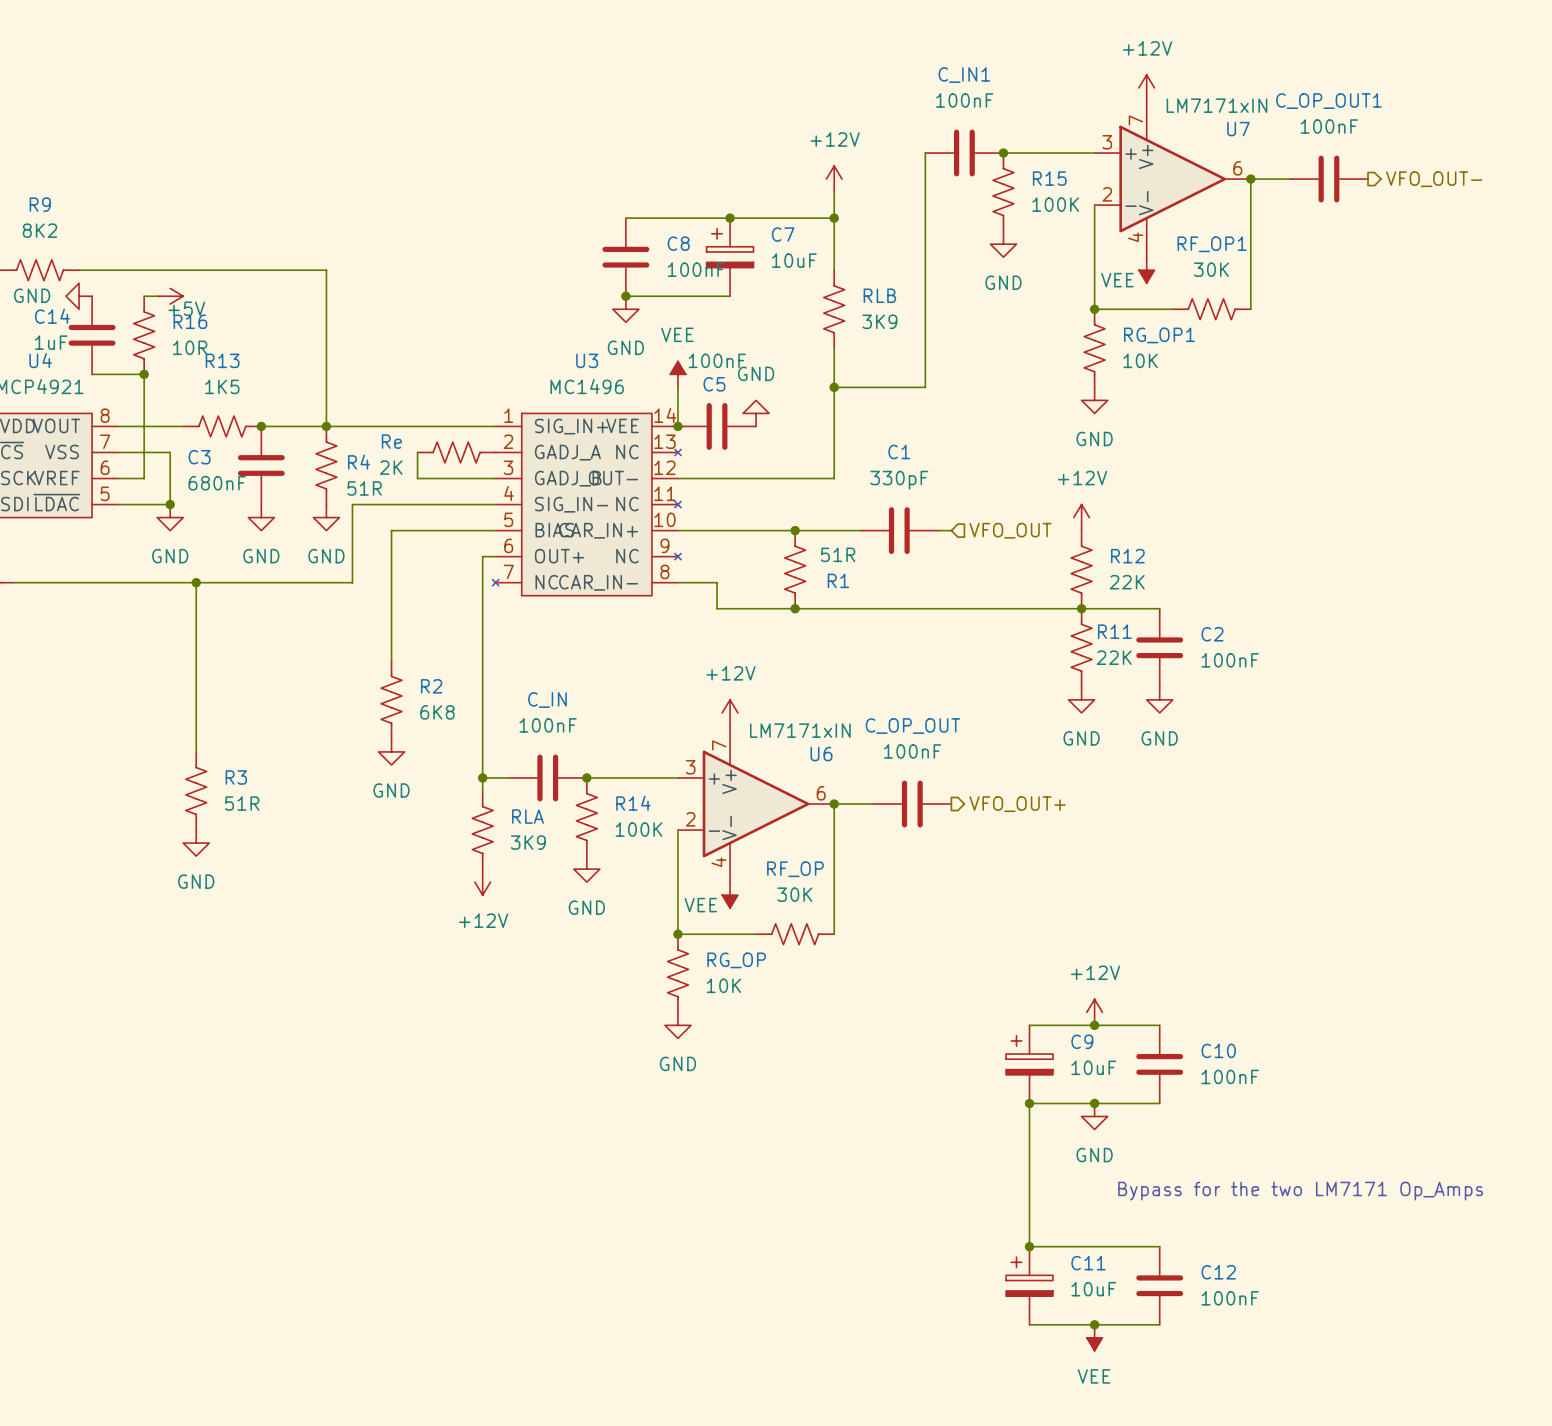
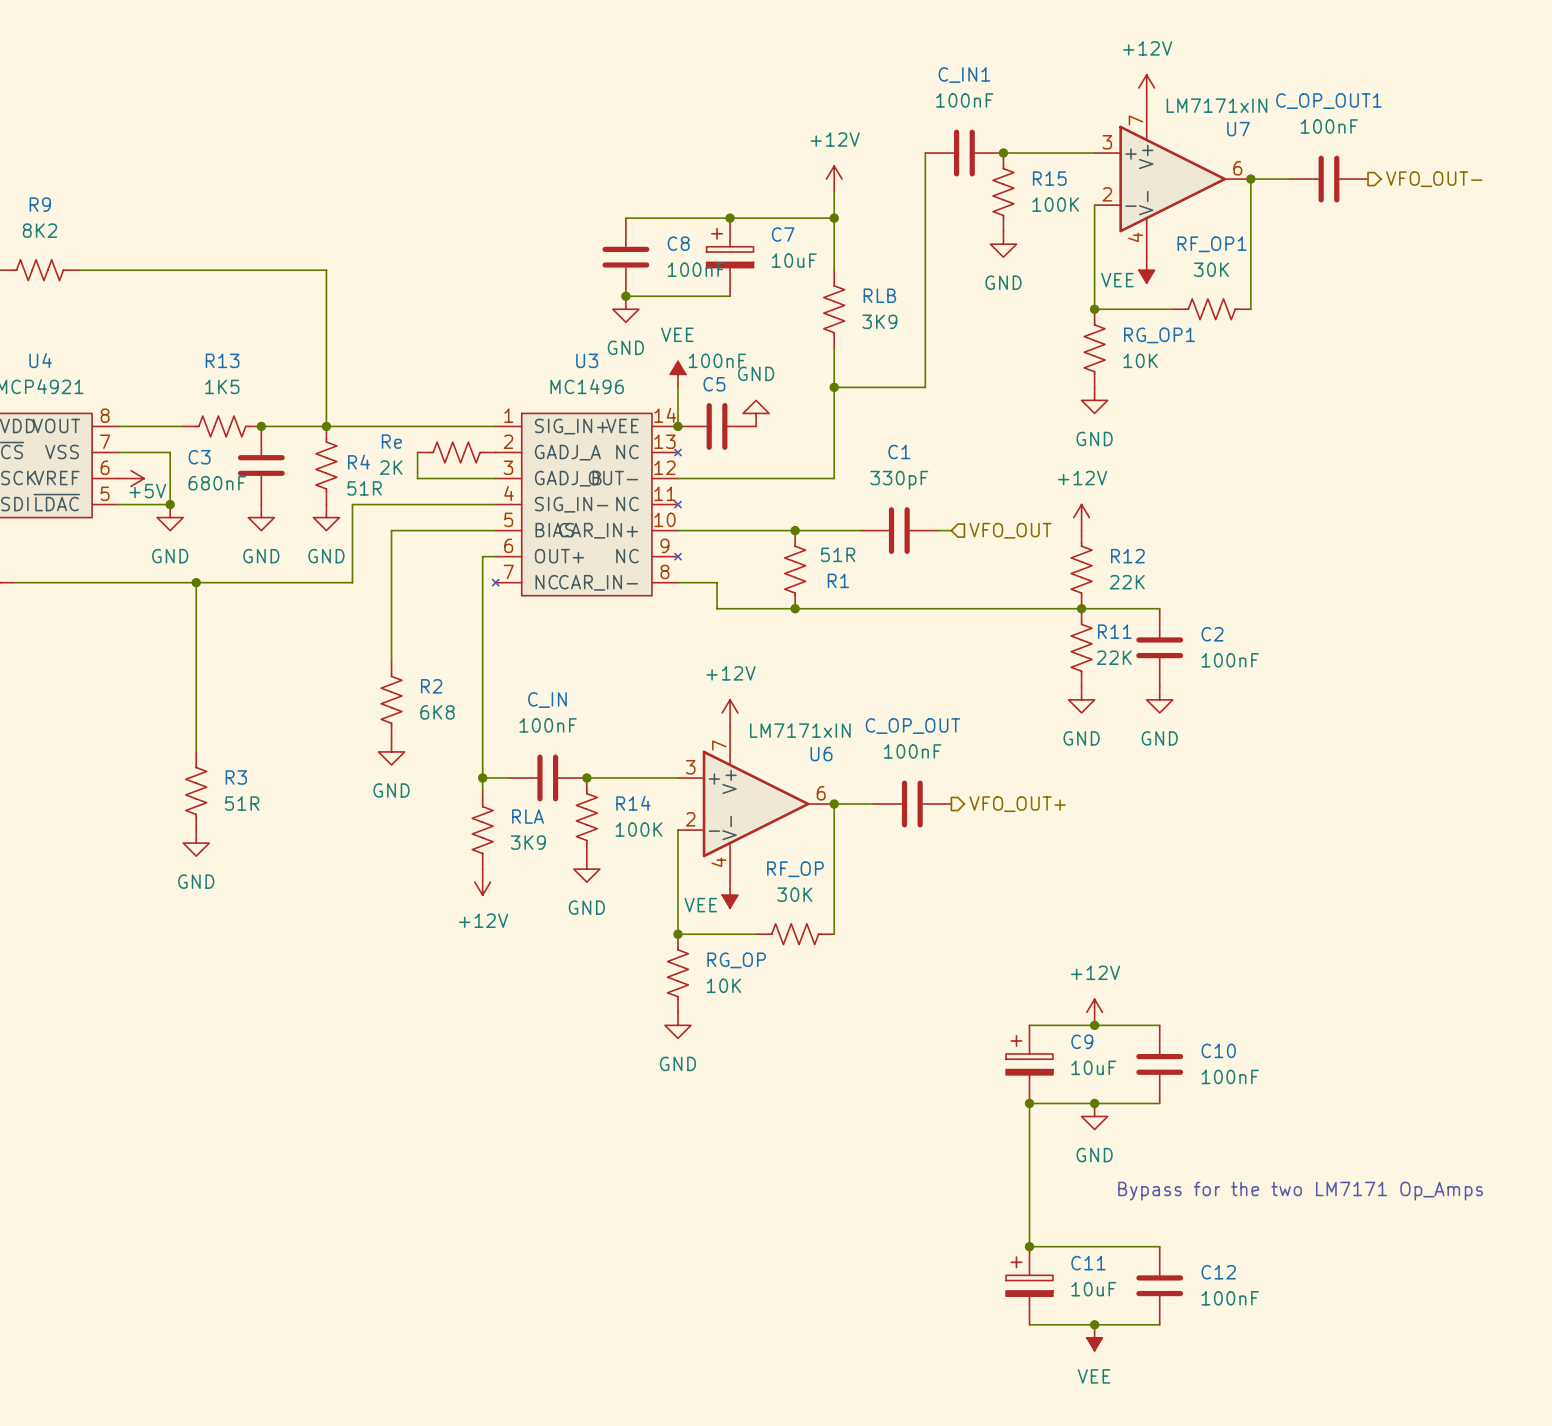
power symbol: GND (79, 296) -> none
wire: (144, 296) (157, 296) -> none
power symbol position: +5V (170, 296) -> +5V (131, 478)
C14: 1uF (92, 335) -> none
R16: 10R (144, 335) -> none
wire: (92, 374) (144, 374) (144, 478) (118, 478) -> none
junction: (144, 374) -> none

